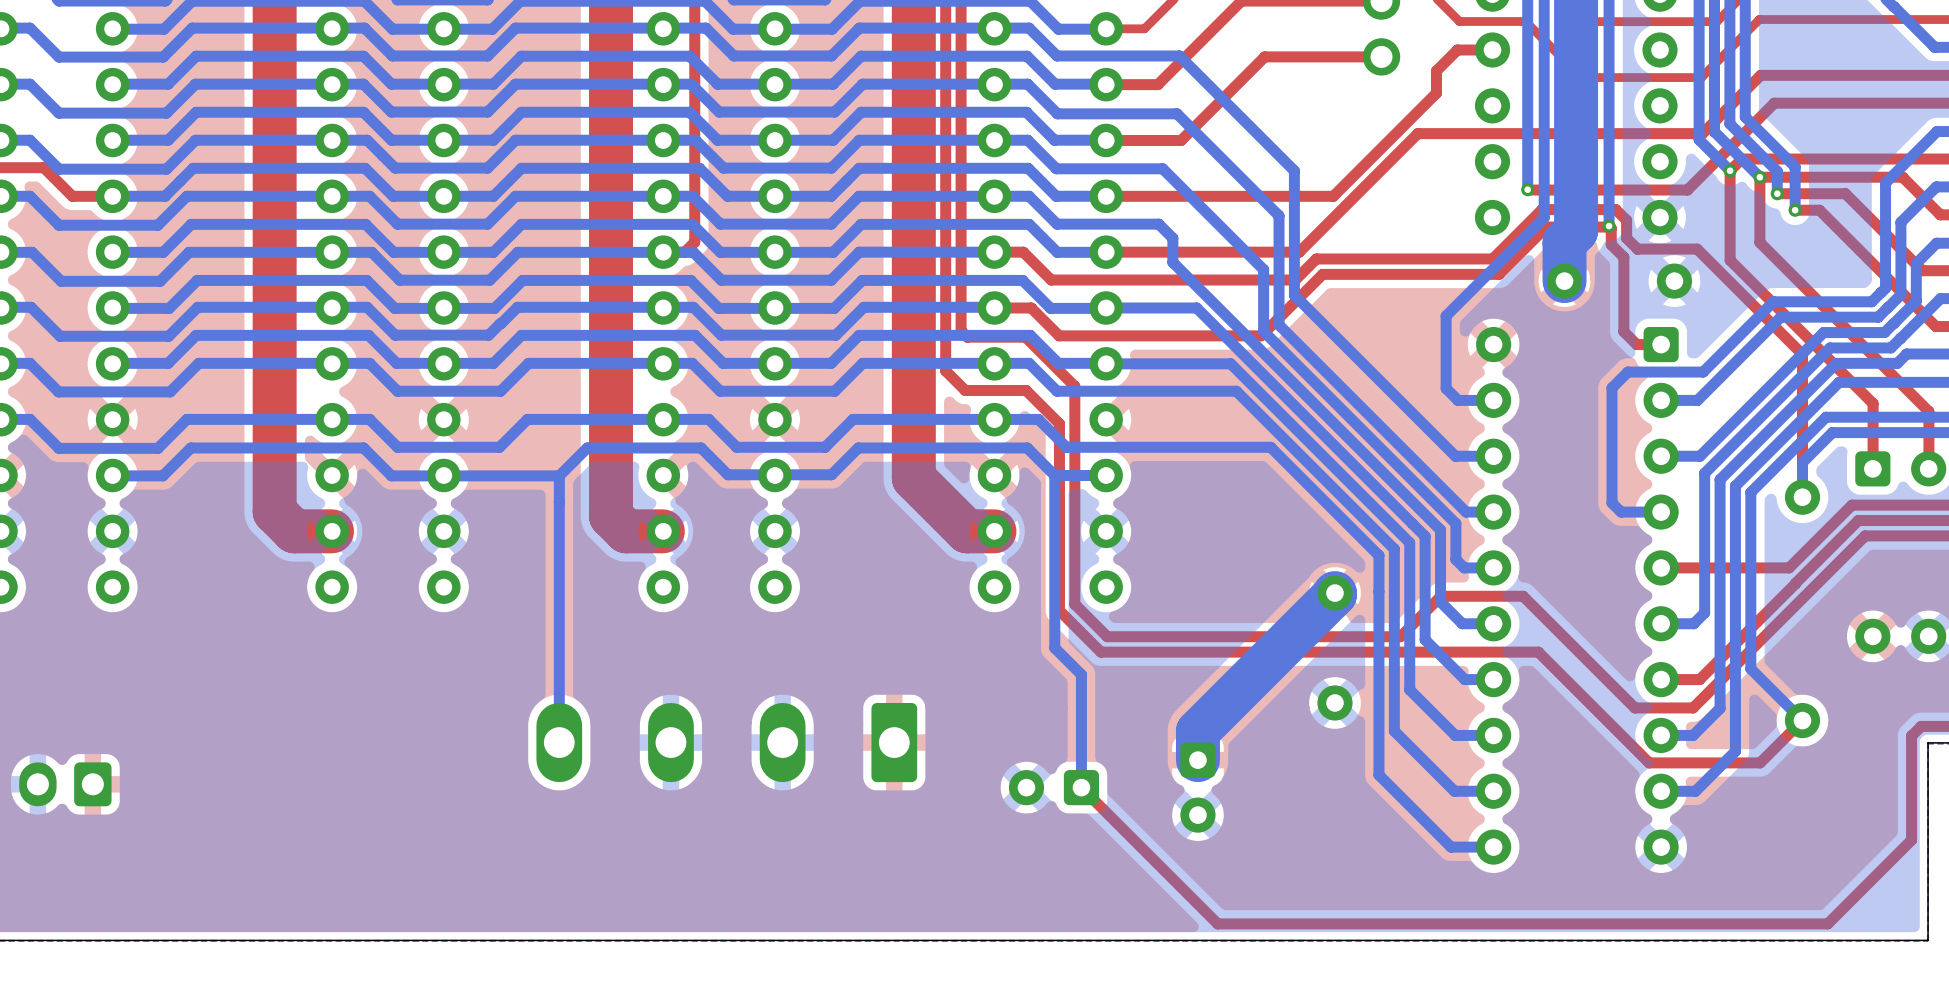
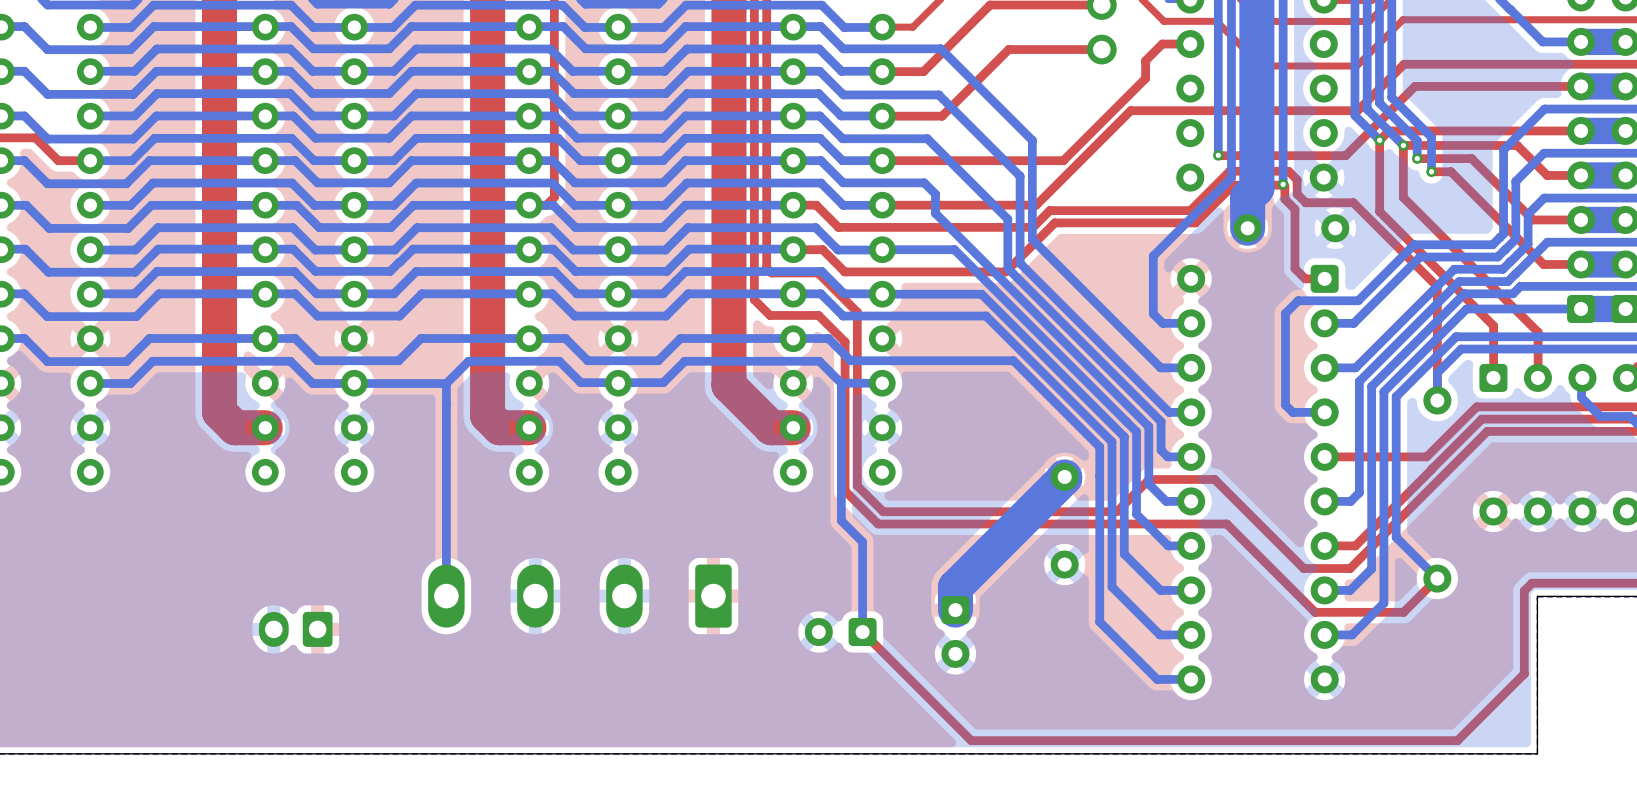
part position: (65, 784) -> (295, 629)

